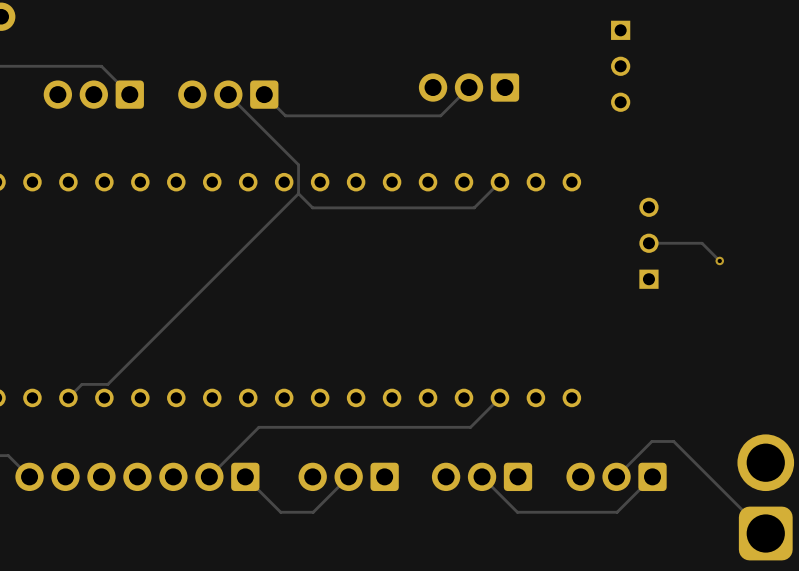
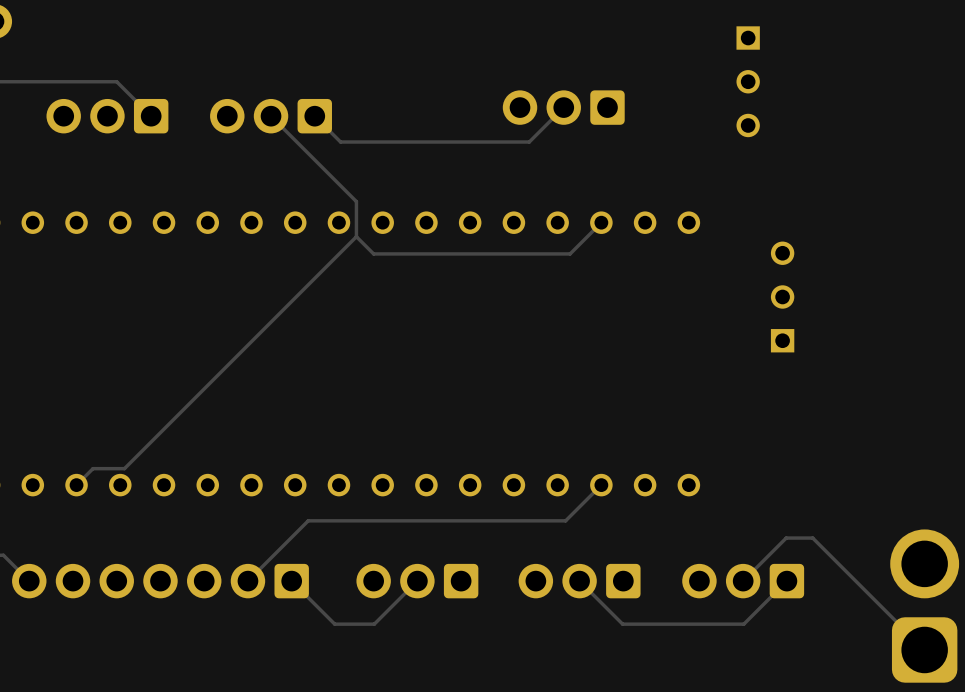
track: (648, 243) (702, 243) (719, 260) -> none
via: (719, 260) -> none

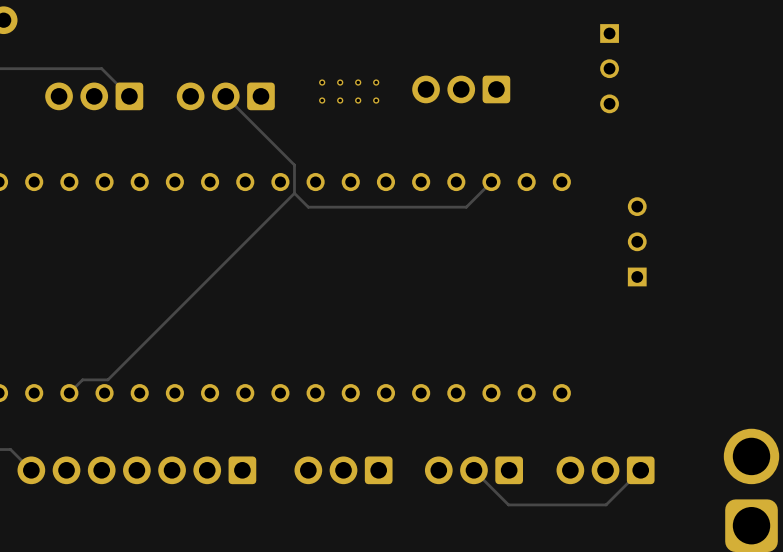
track: (563, 107) (529, 142) (340, 142) (314, 116) -> none
part: none -> (349, 91)
track: (601, 485) (565, 520) (308, 520) (247, 581) -> none
track: (417, 581) (374, 624) (334, 624) (291, 581) -> none
track: (743, 581) (786, 538) (812, 538) (924, 649) -> none

